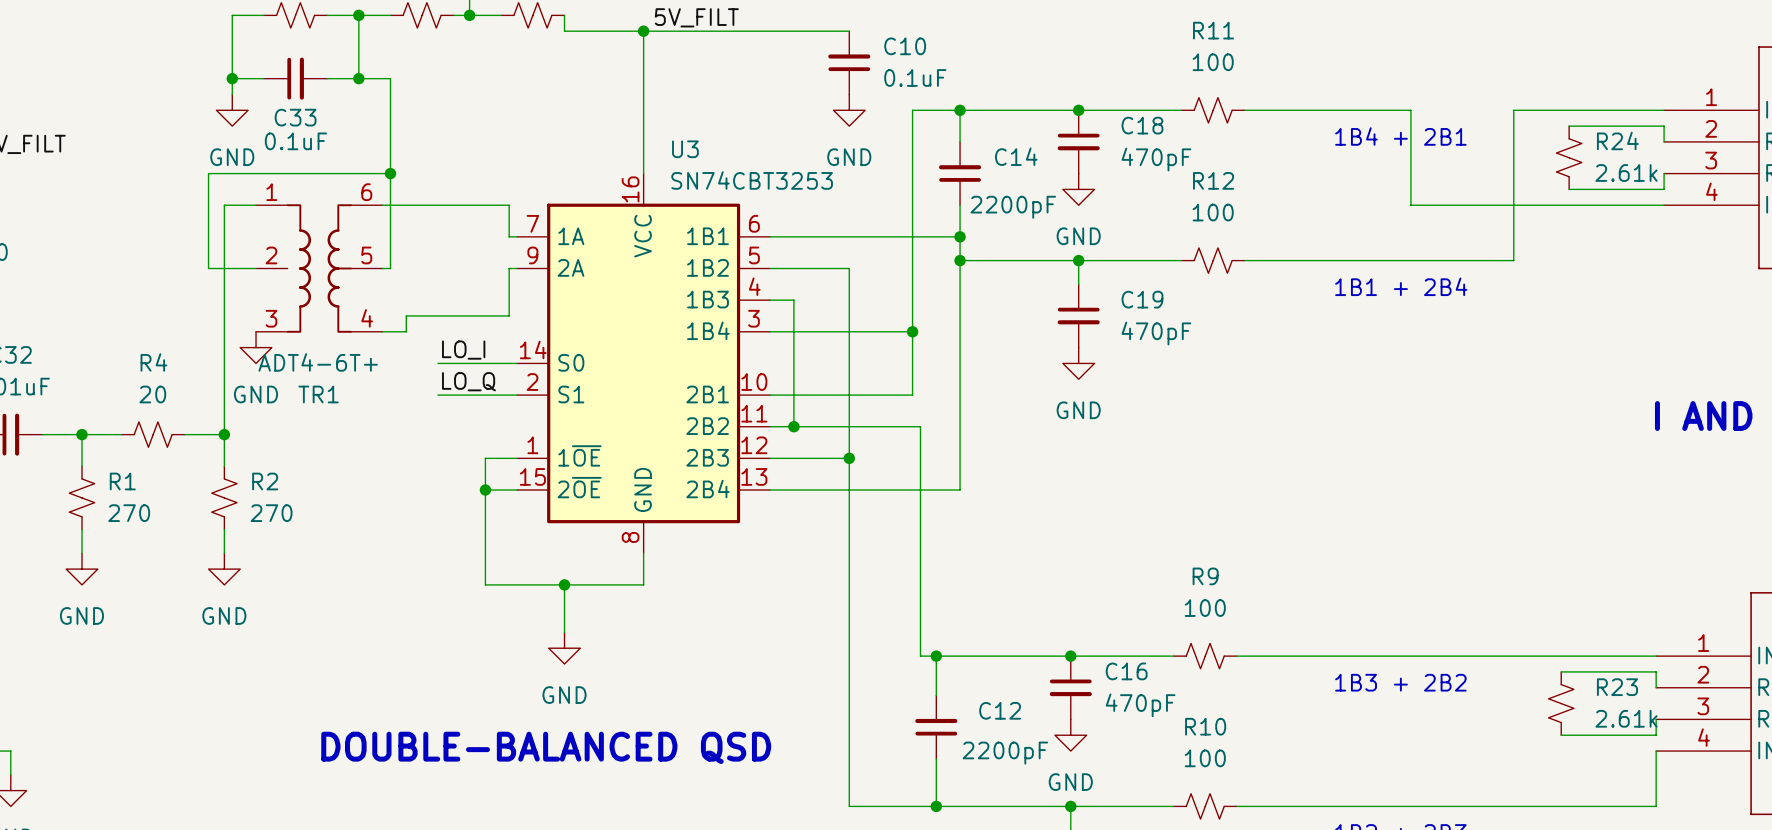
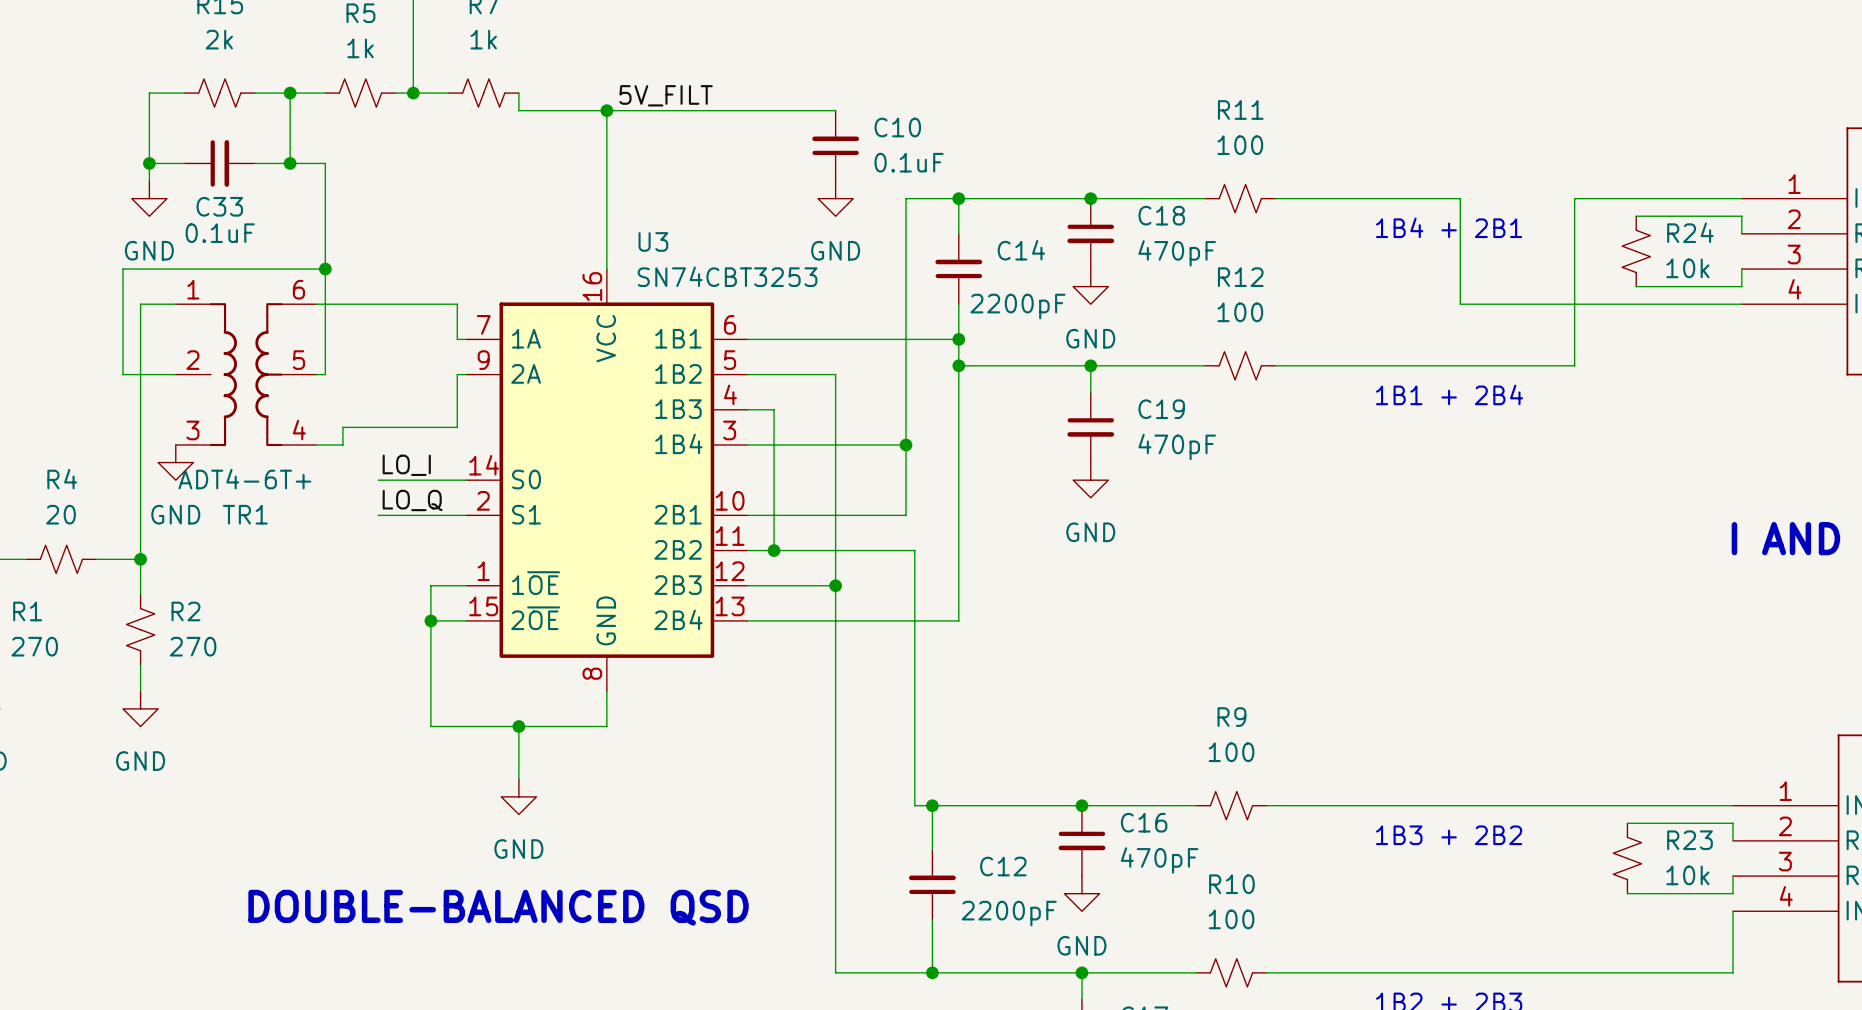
R24 value: 2.61k (1626, 172) -> 10k (1687, 268)
R23 value: 2.61k (1626, 718) -> 10k (1687, 875)

